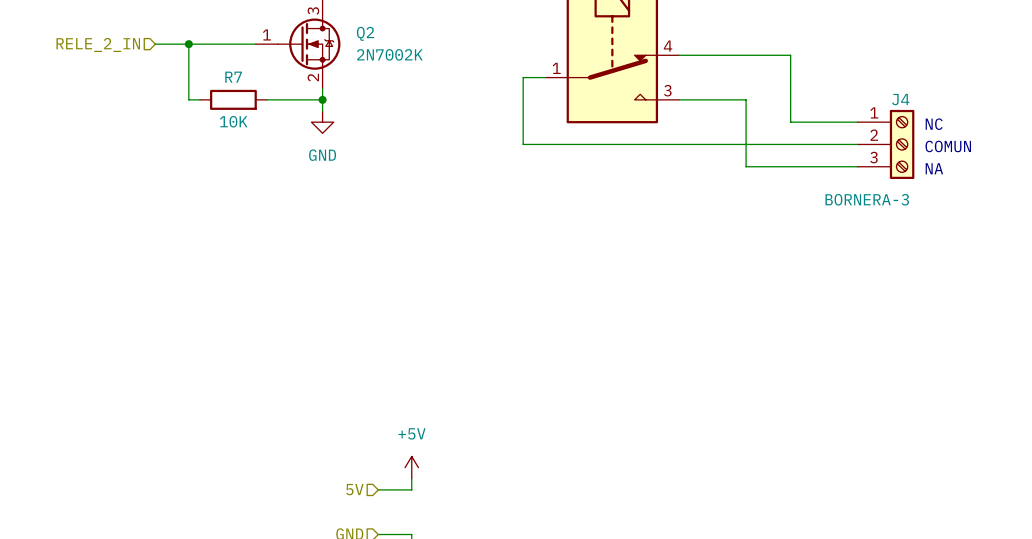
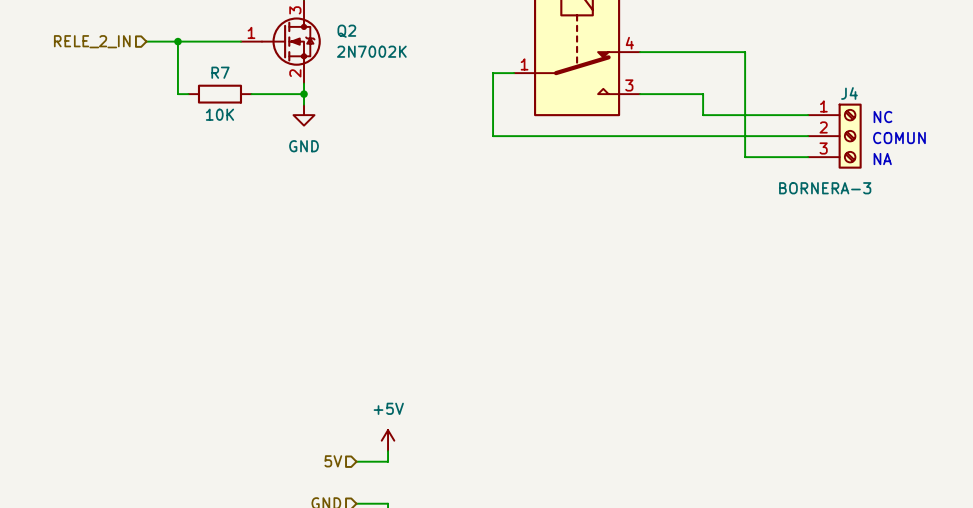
wire: (746, 122) (746, 166) (790, 166) -> (703, 115) (745, 115) (745, 157)

